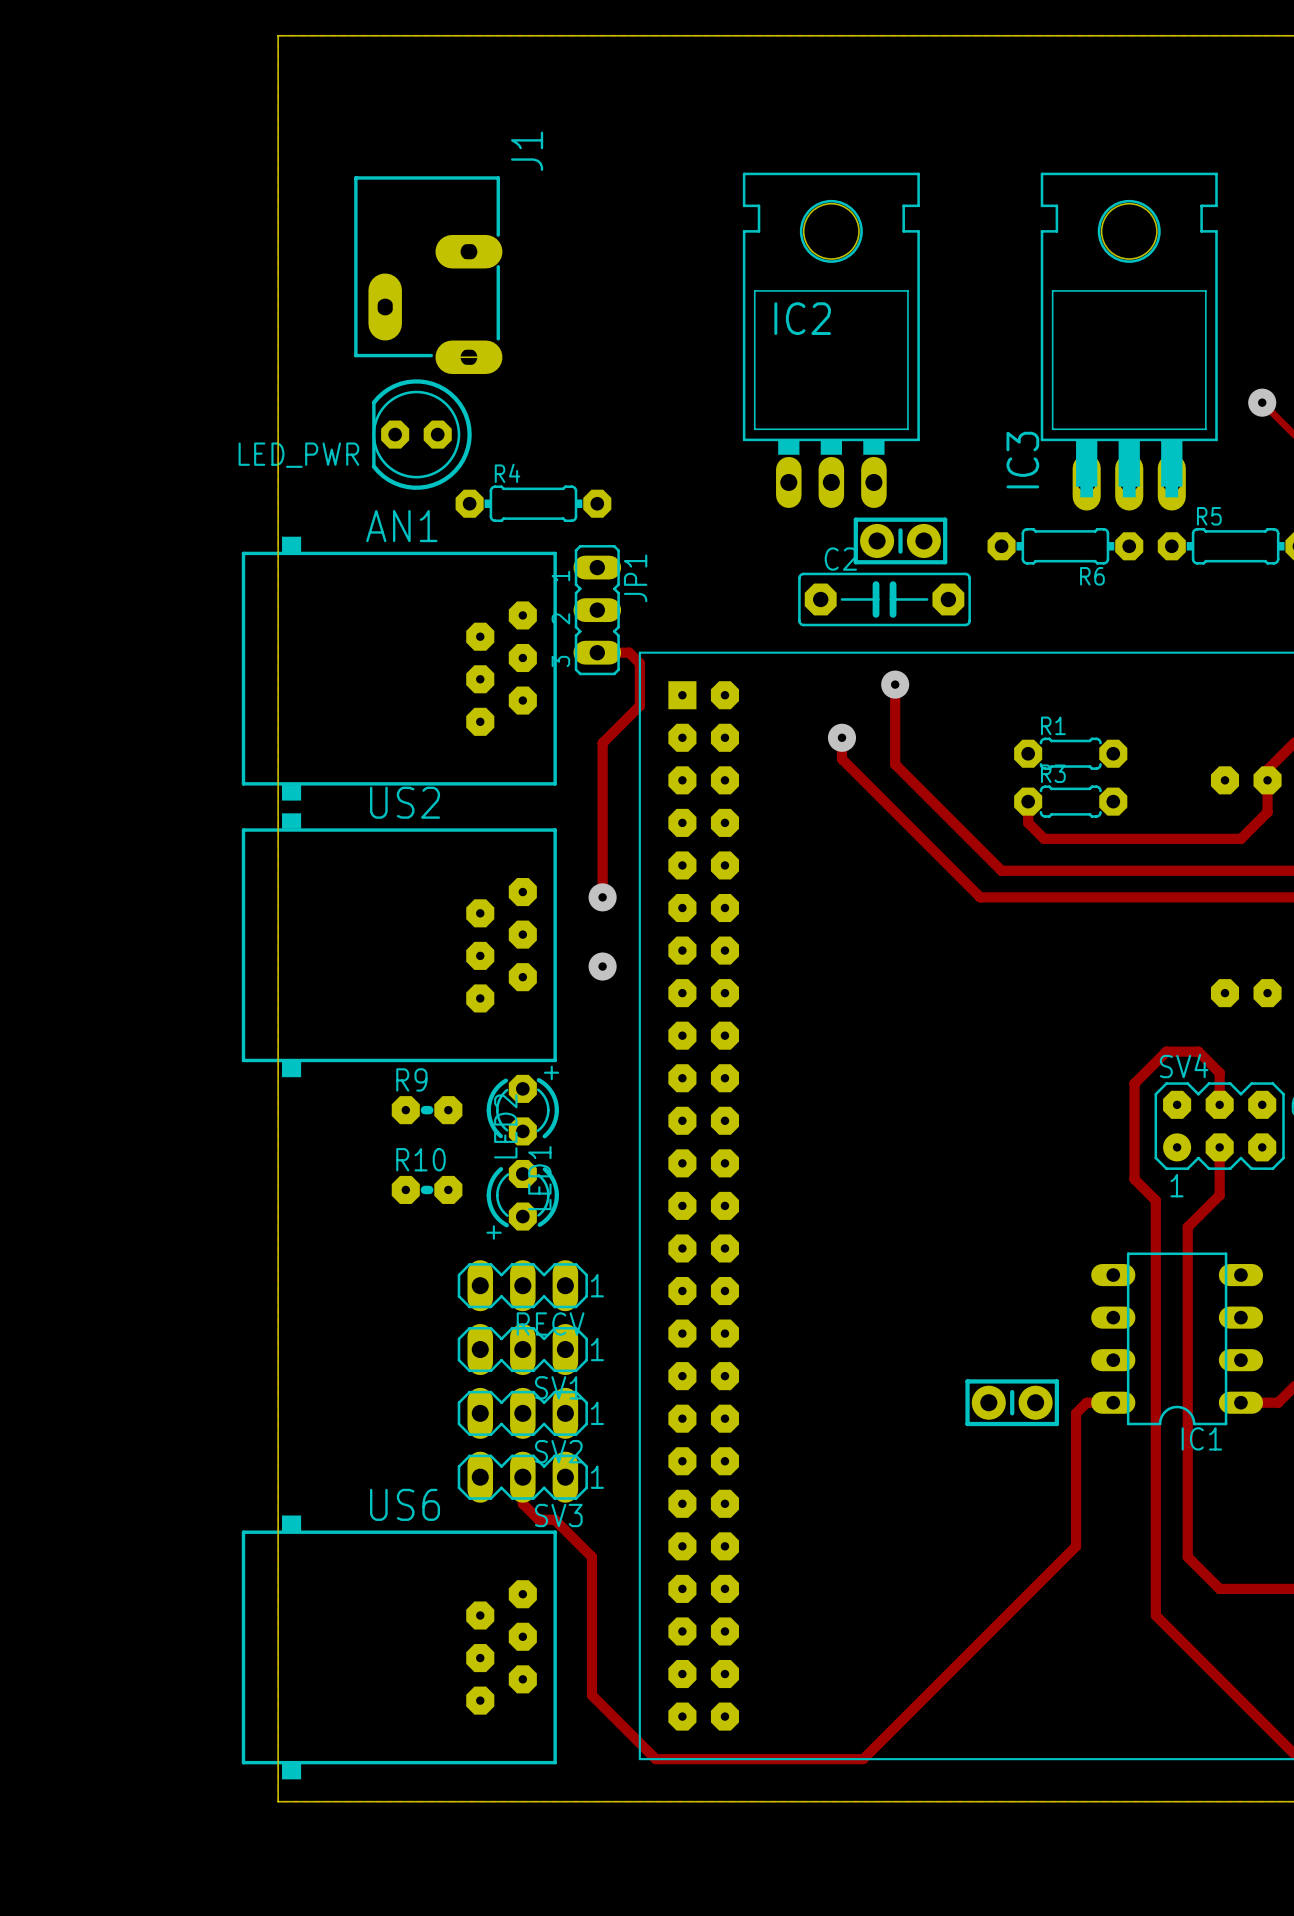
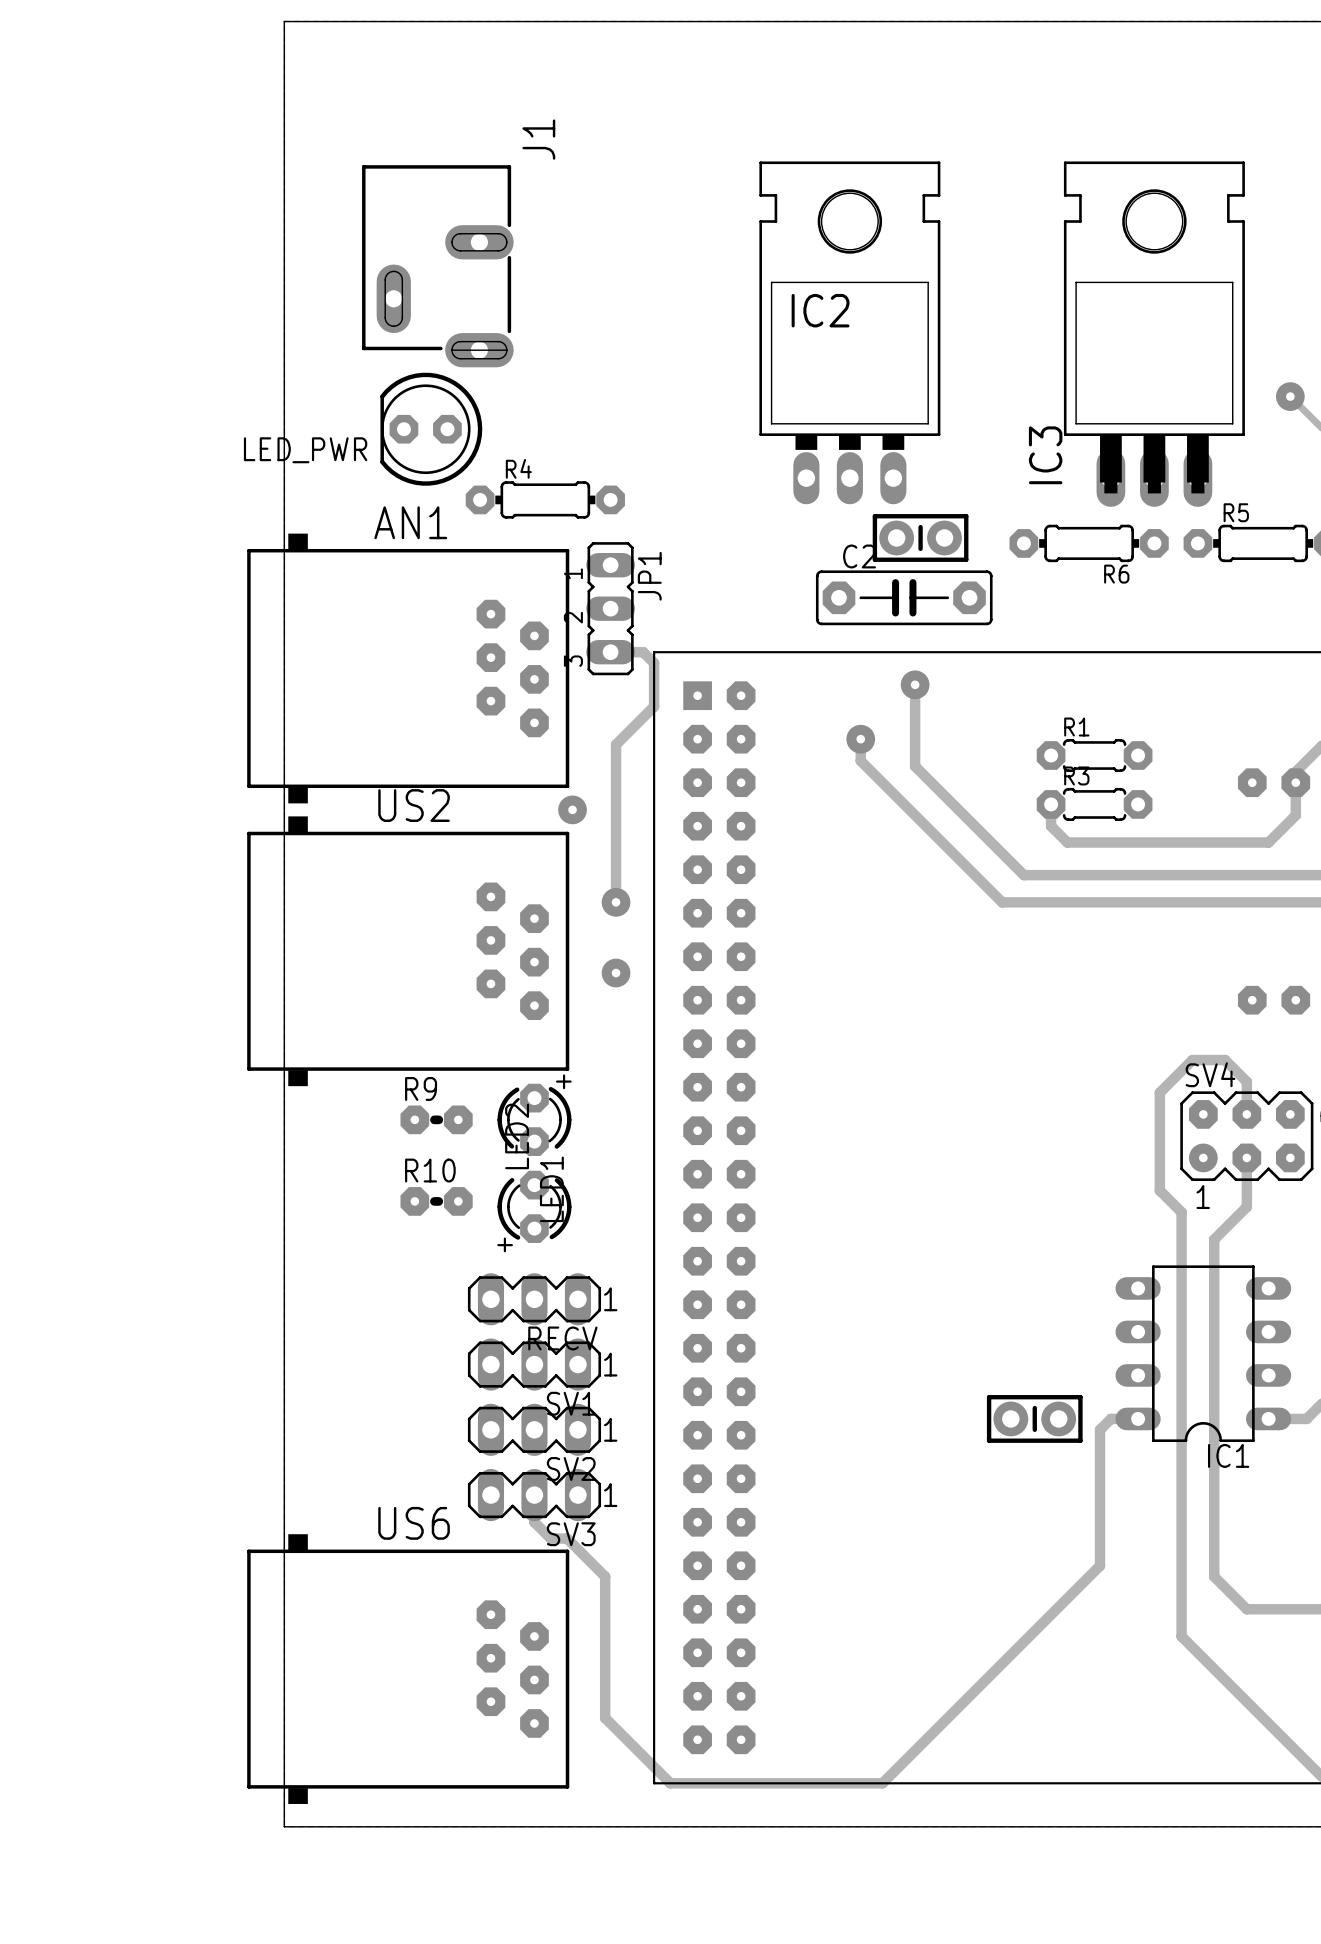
AN1 footprint: [241, 536, 557, 801] -> [247, 533, 570, 804]
via: none -> (572, 809)
US2 footprint: [241, 813, 557, 1078] -> [247, 816, 570, 1087]
US6 footprint: [241, 1515, 557, 1780] -> [247, 1534, 570, 1804]

